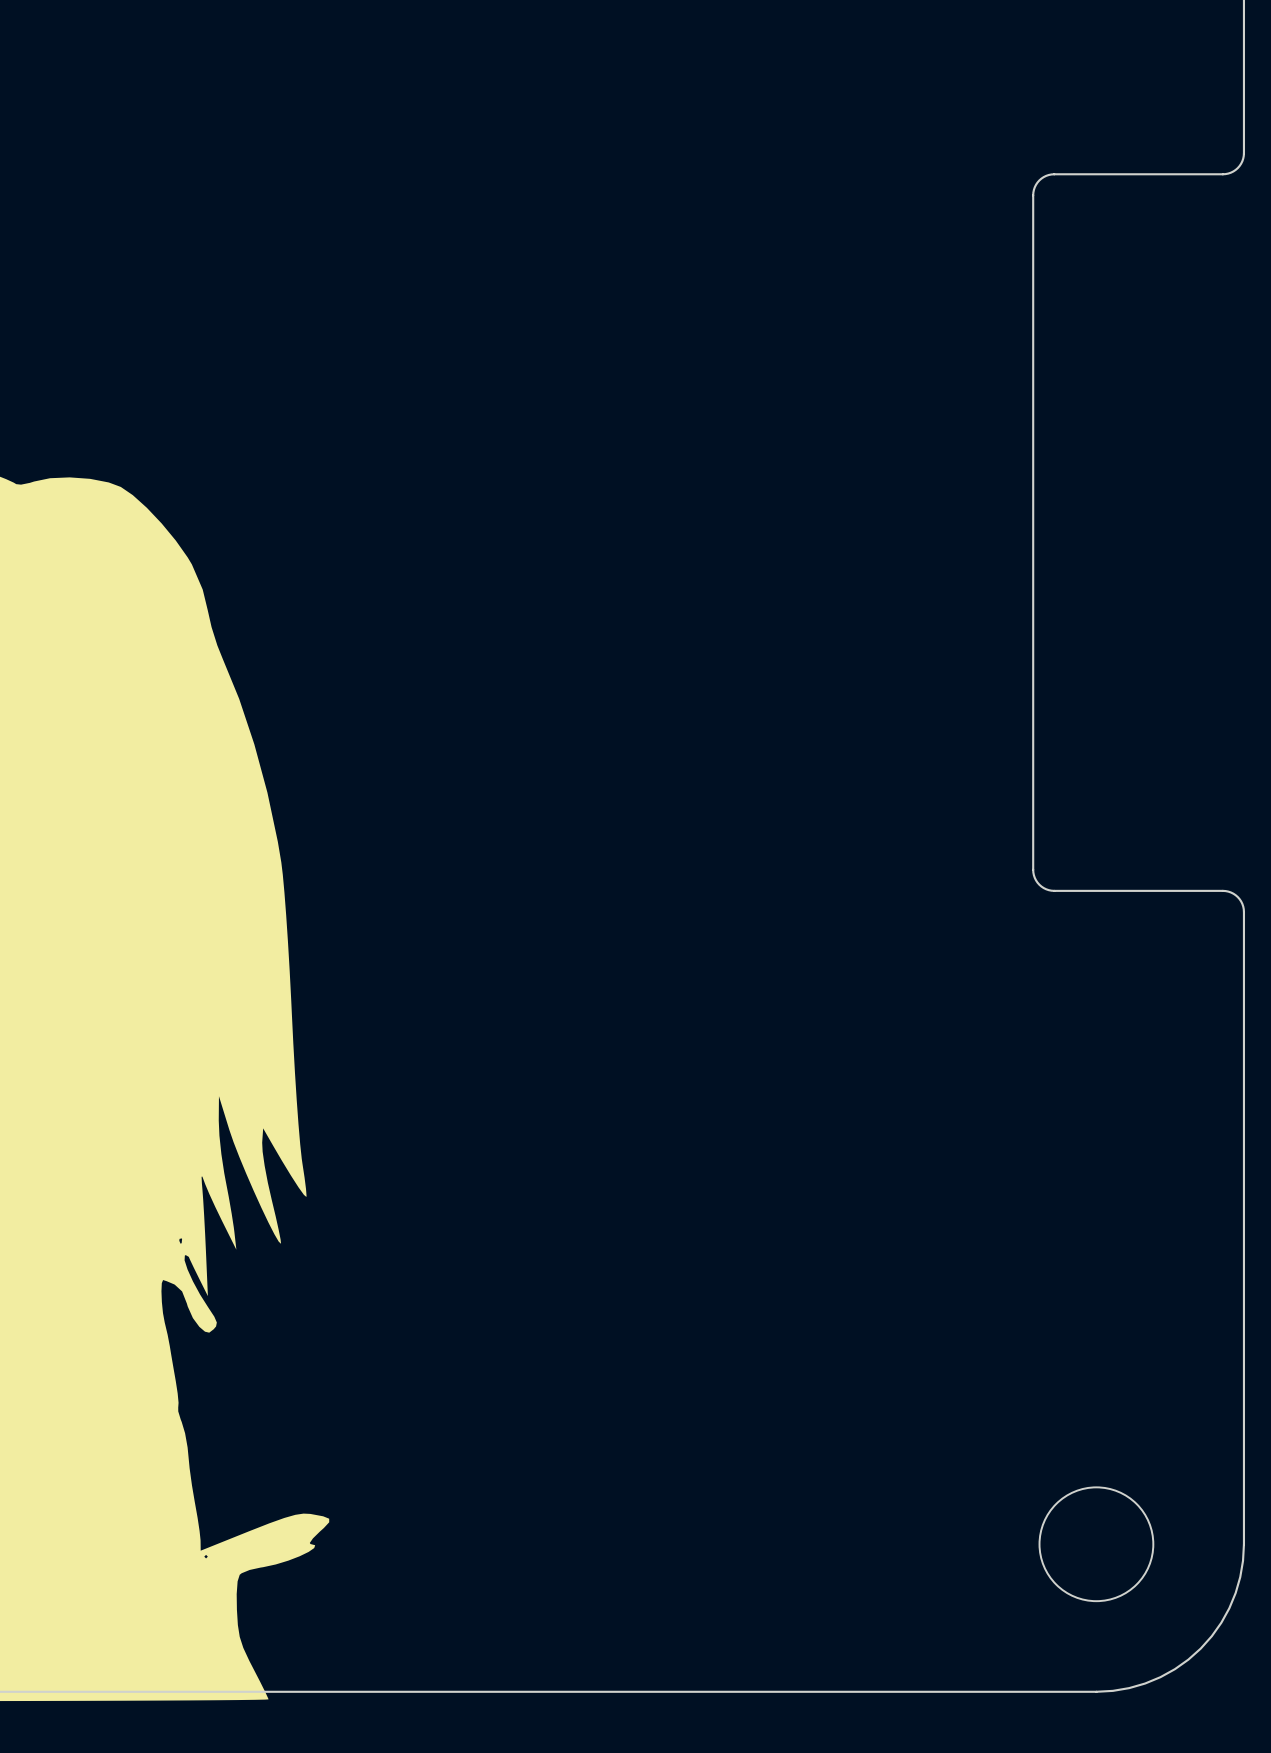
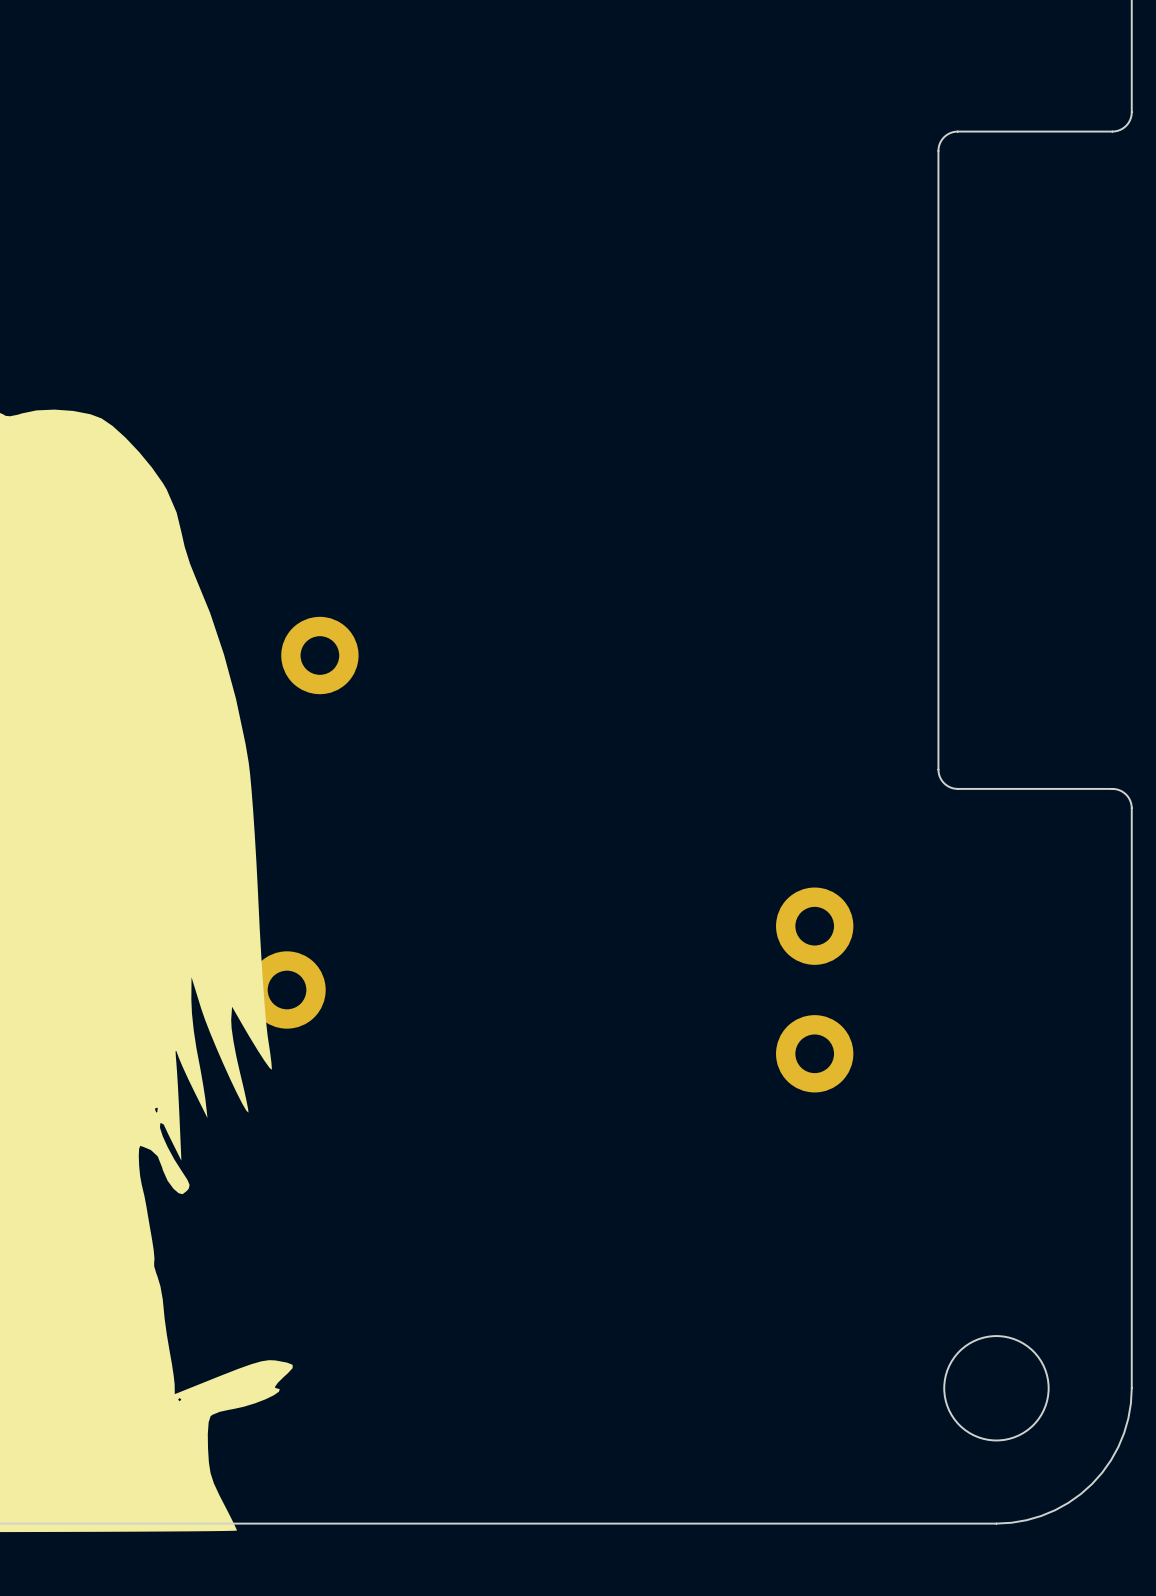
part: none -> (319, 655)
part: none -> (814, 926)
part: none -> (287, 989)
part: none -> (814, 1053)

